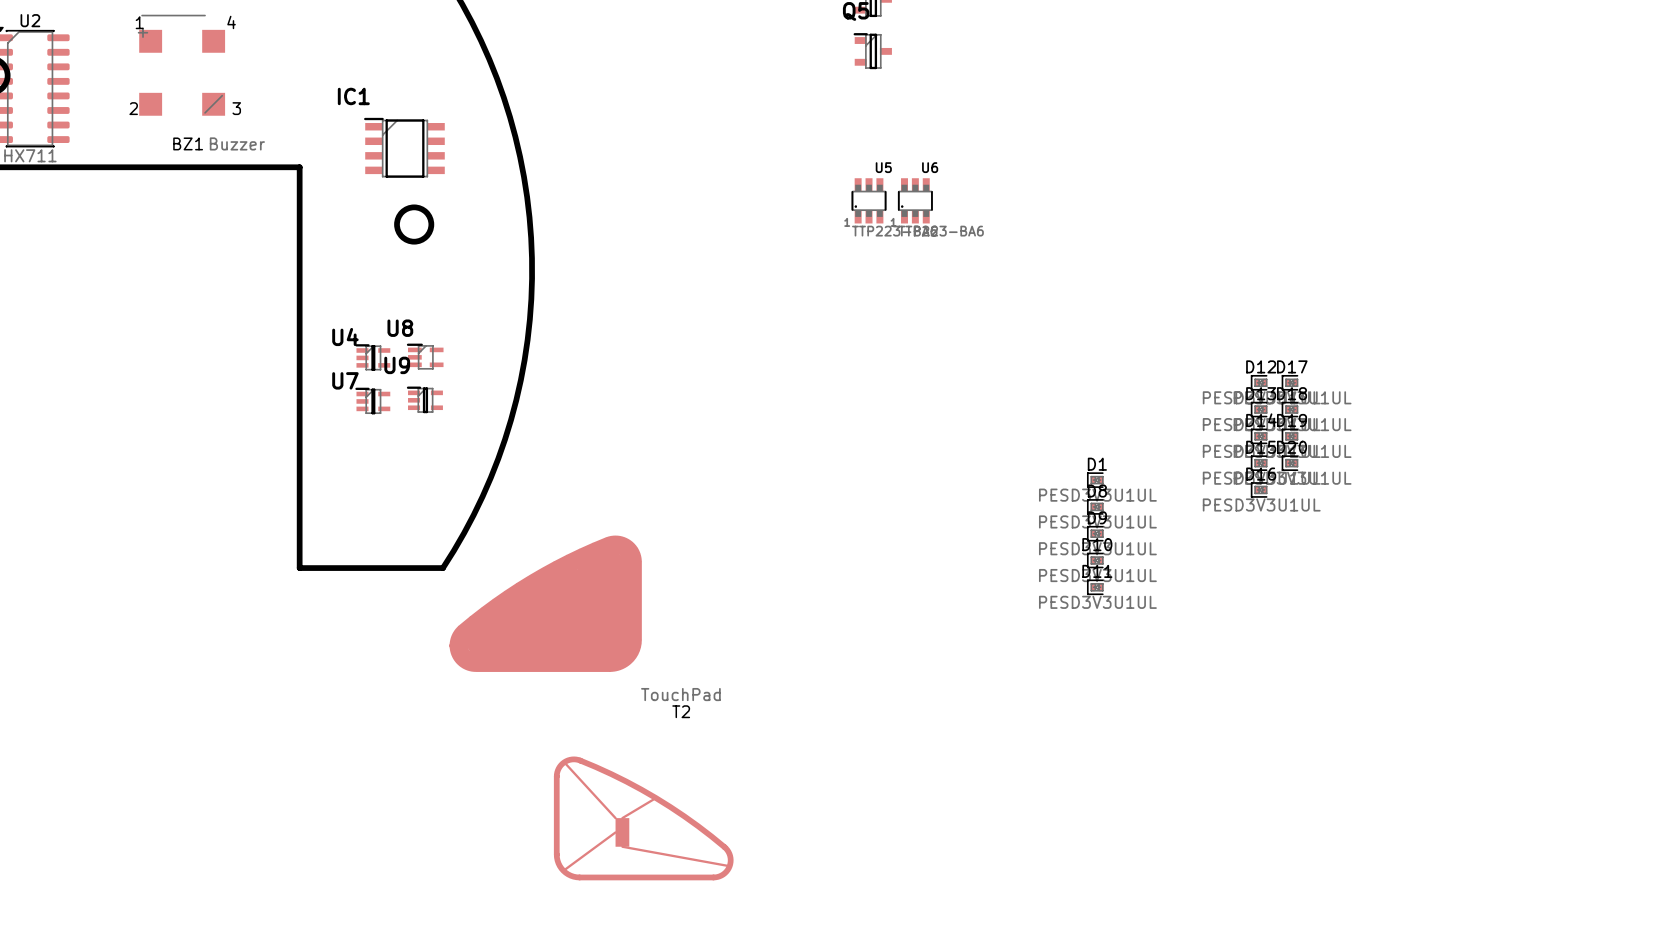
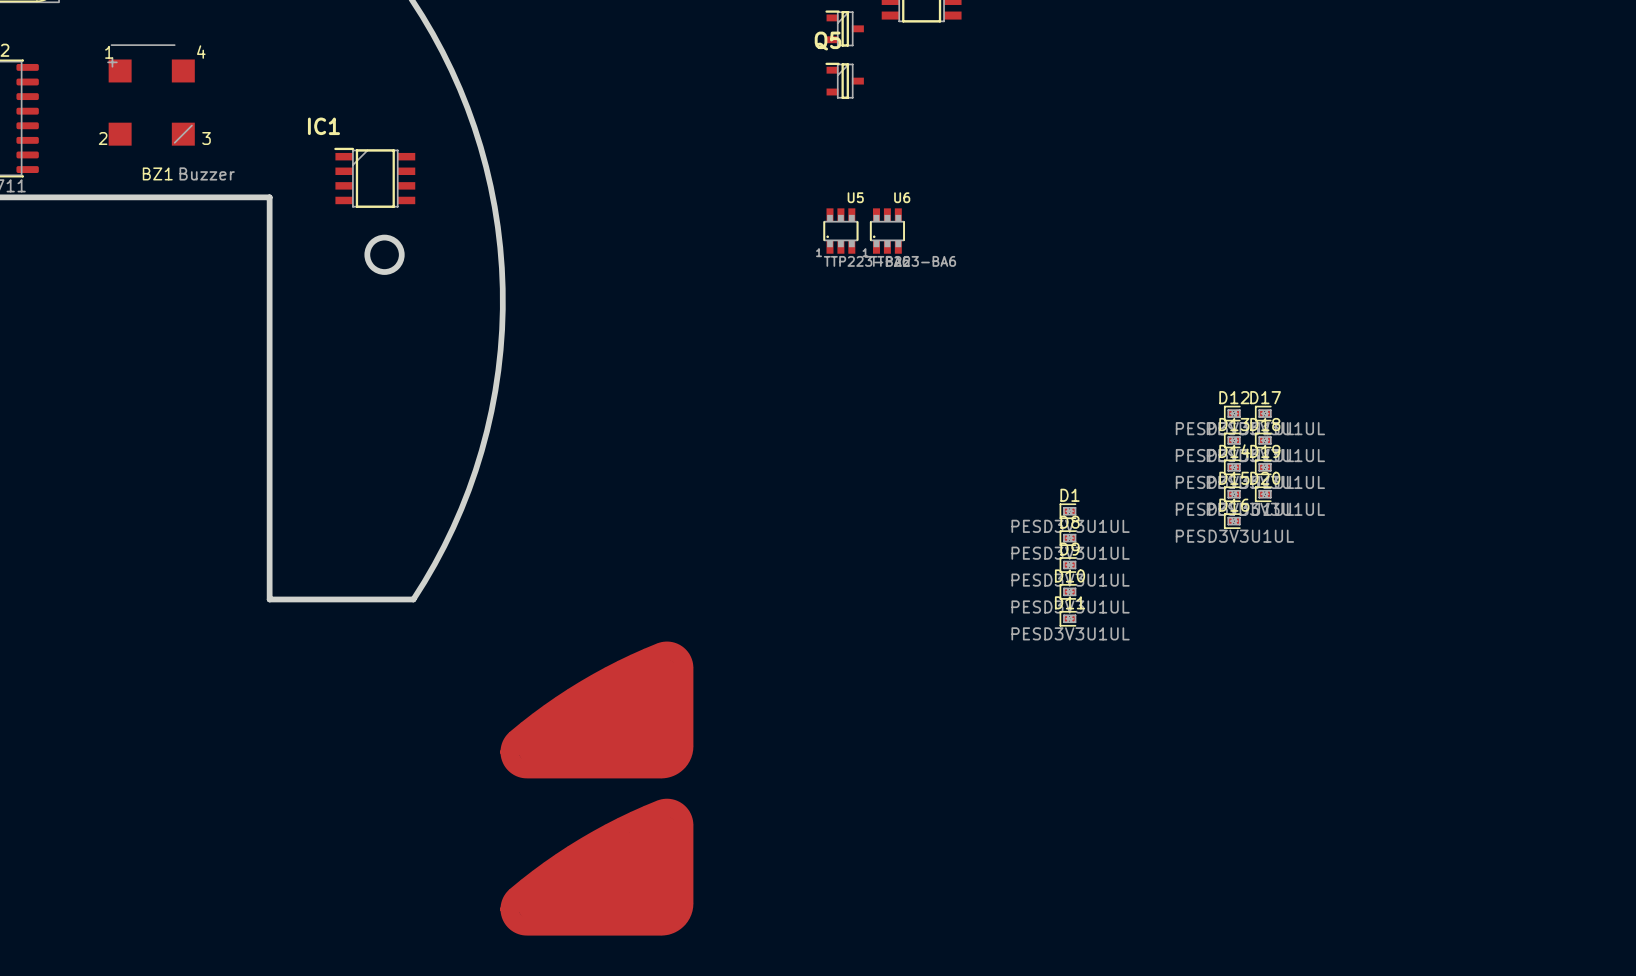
U8: (425, 356) -> none
U4: (372, 357) -> none
U9: (424, 399) -> none
U7: (372, 401) -> none
part position: (545, 603) -> (596, 709)
T2: TouchPad (643, 818) -> none
part: none -> (596, 867)

